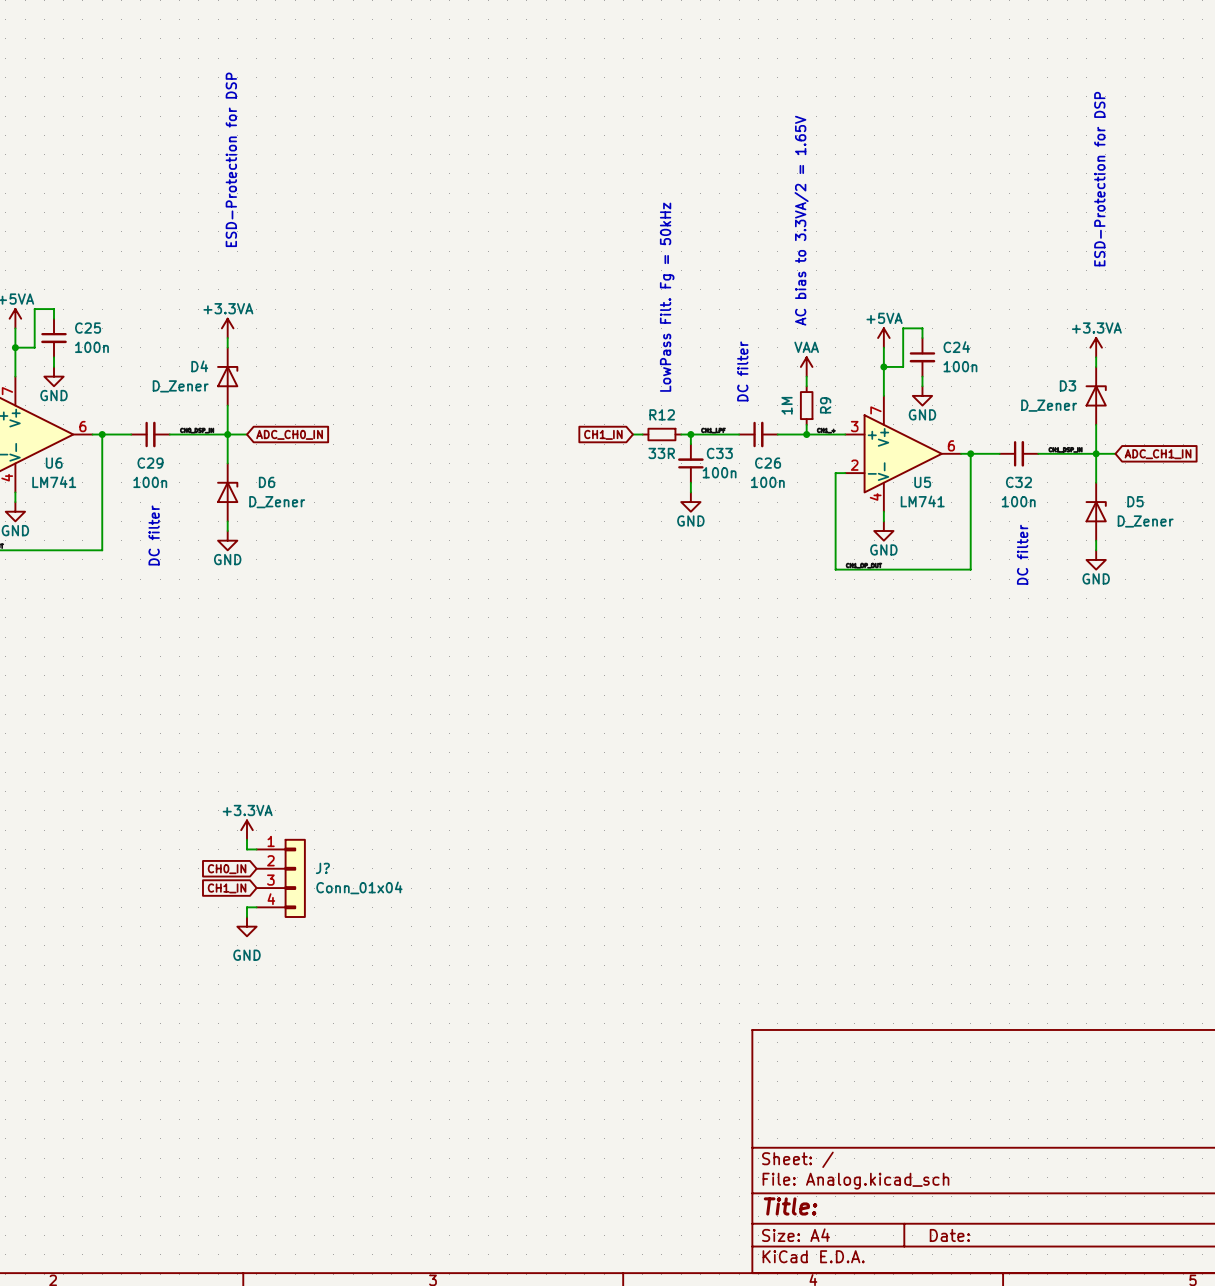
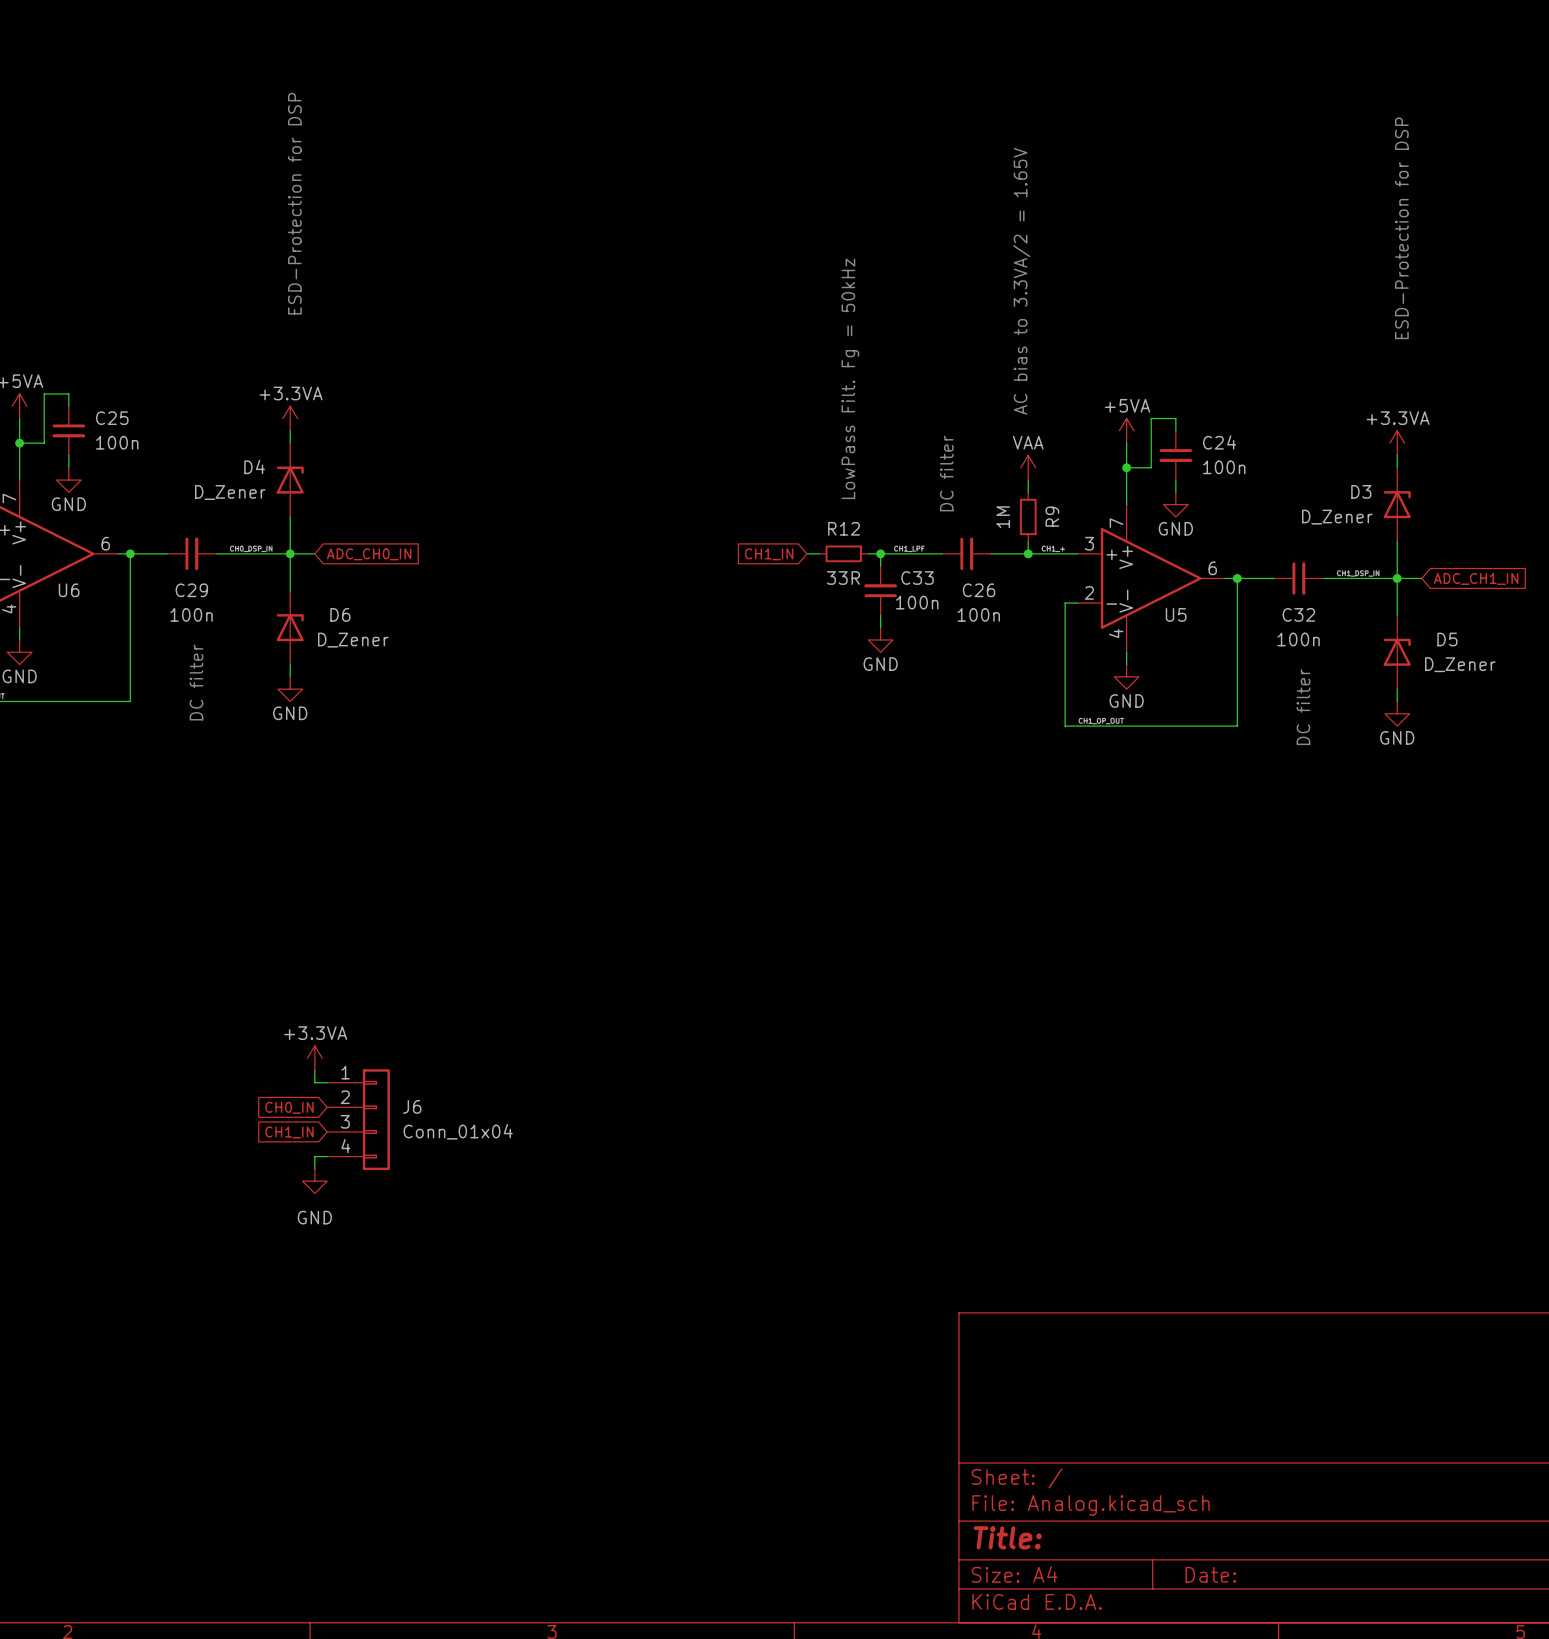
U6 value: LM741 (54, 482) -> none
U5 value: LM741 (922, 501) -> none
J? name: J? (322, 868) -> J6 (412, 1106)

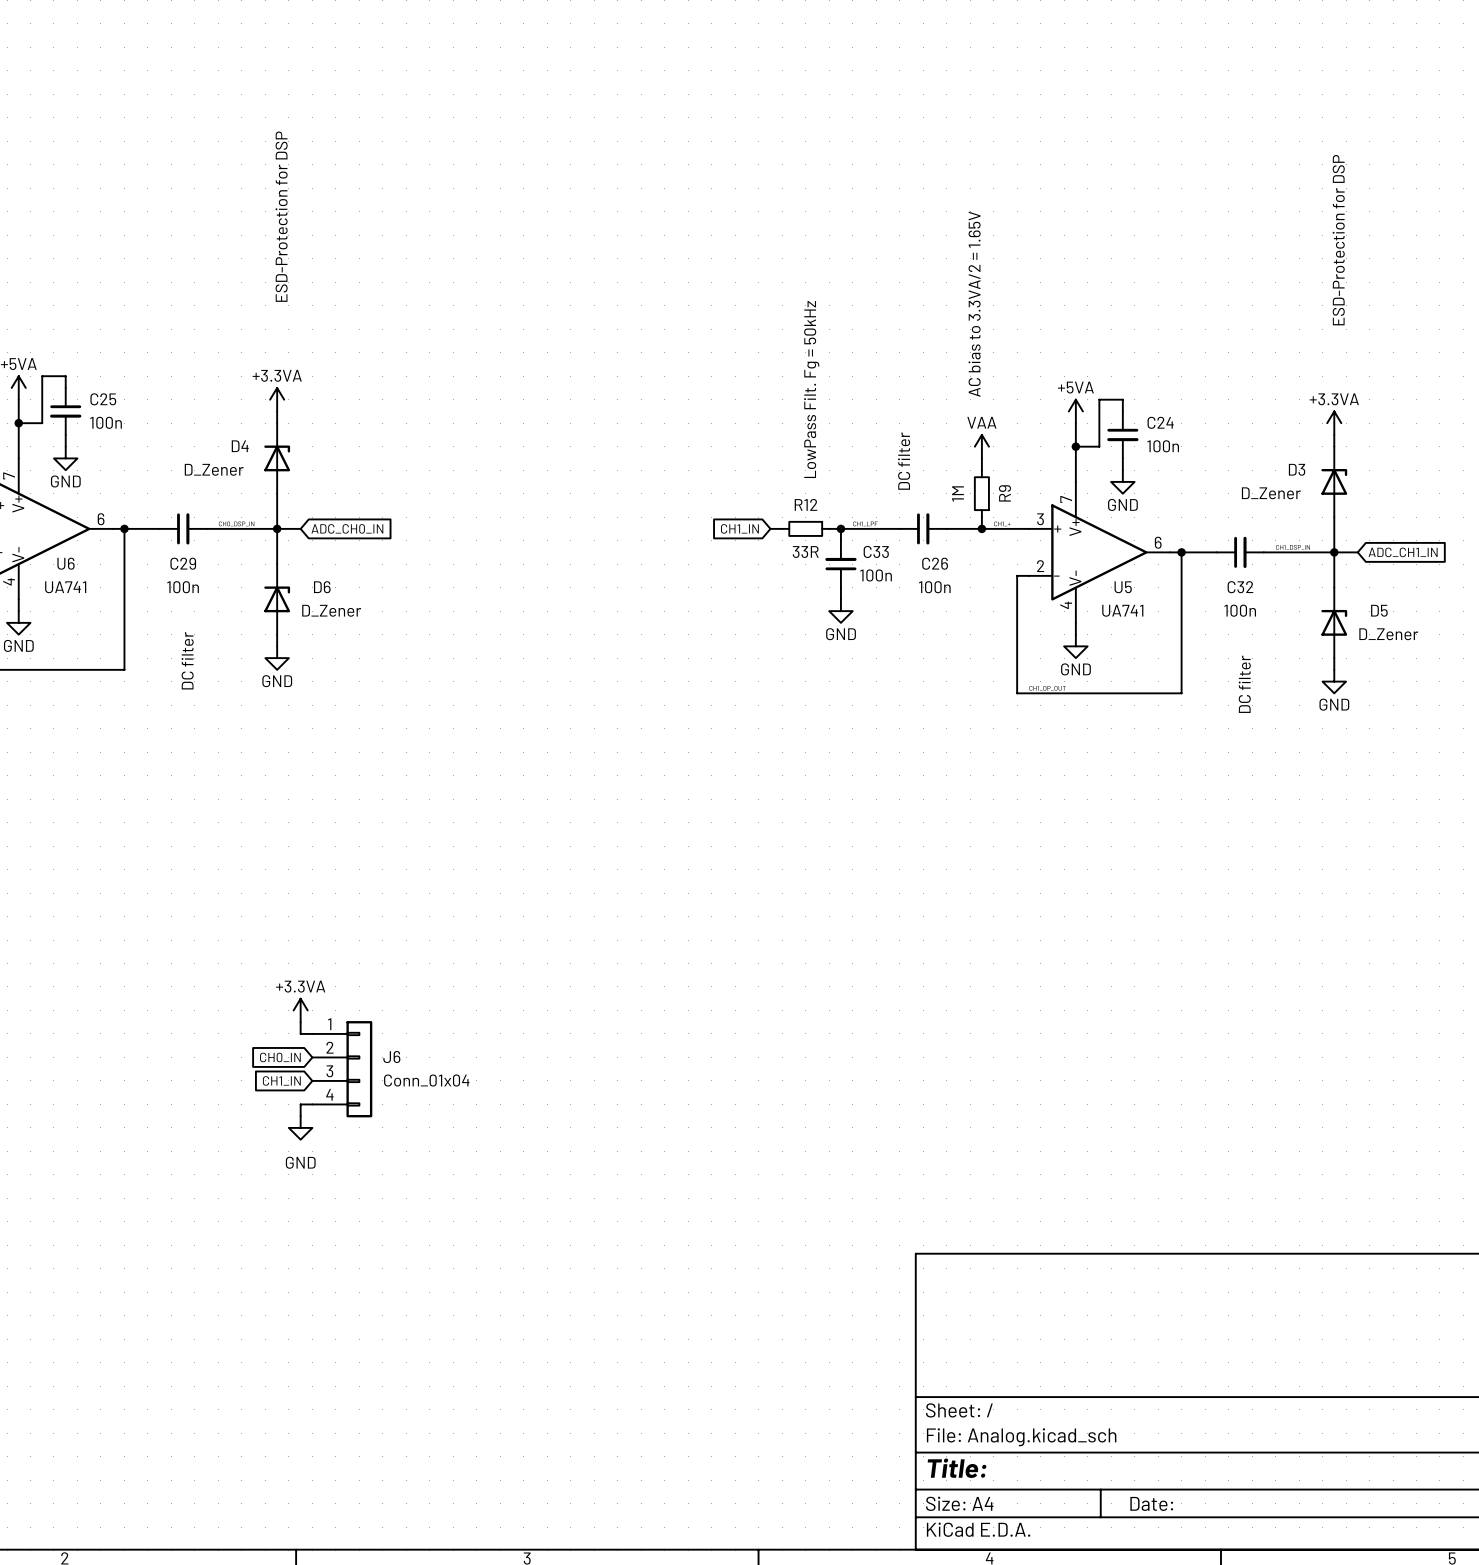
U6 value: none -> UA741 (65, 587)
U5 value: none -> UA741 (1122, 610)

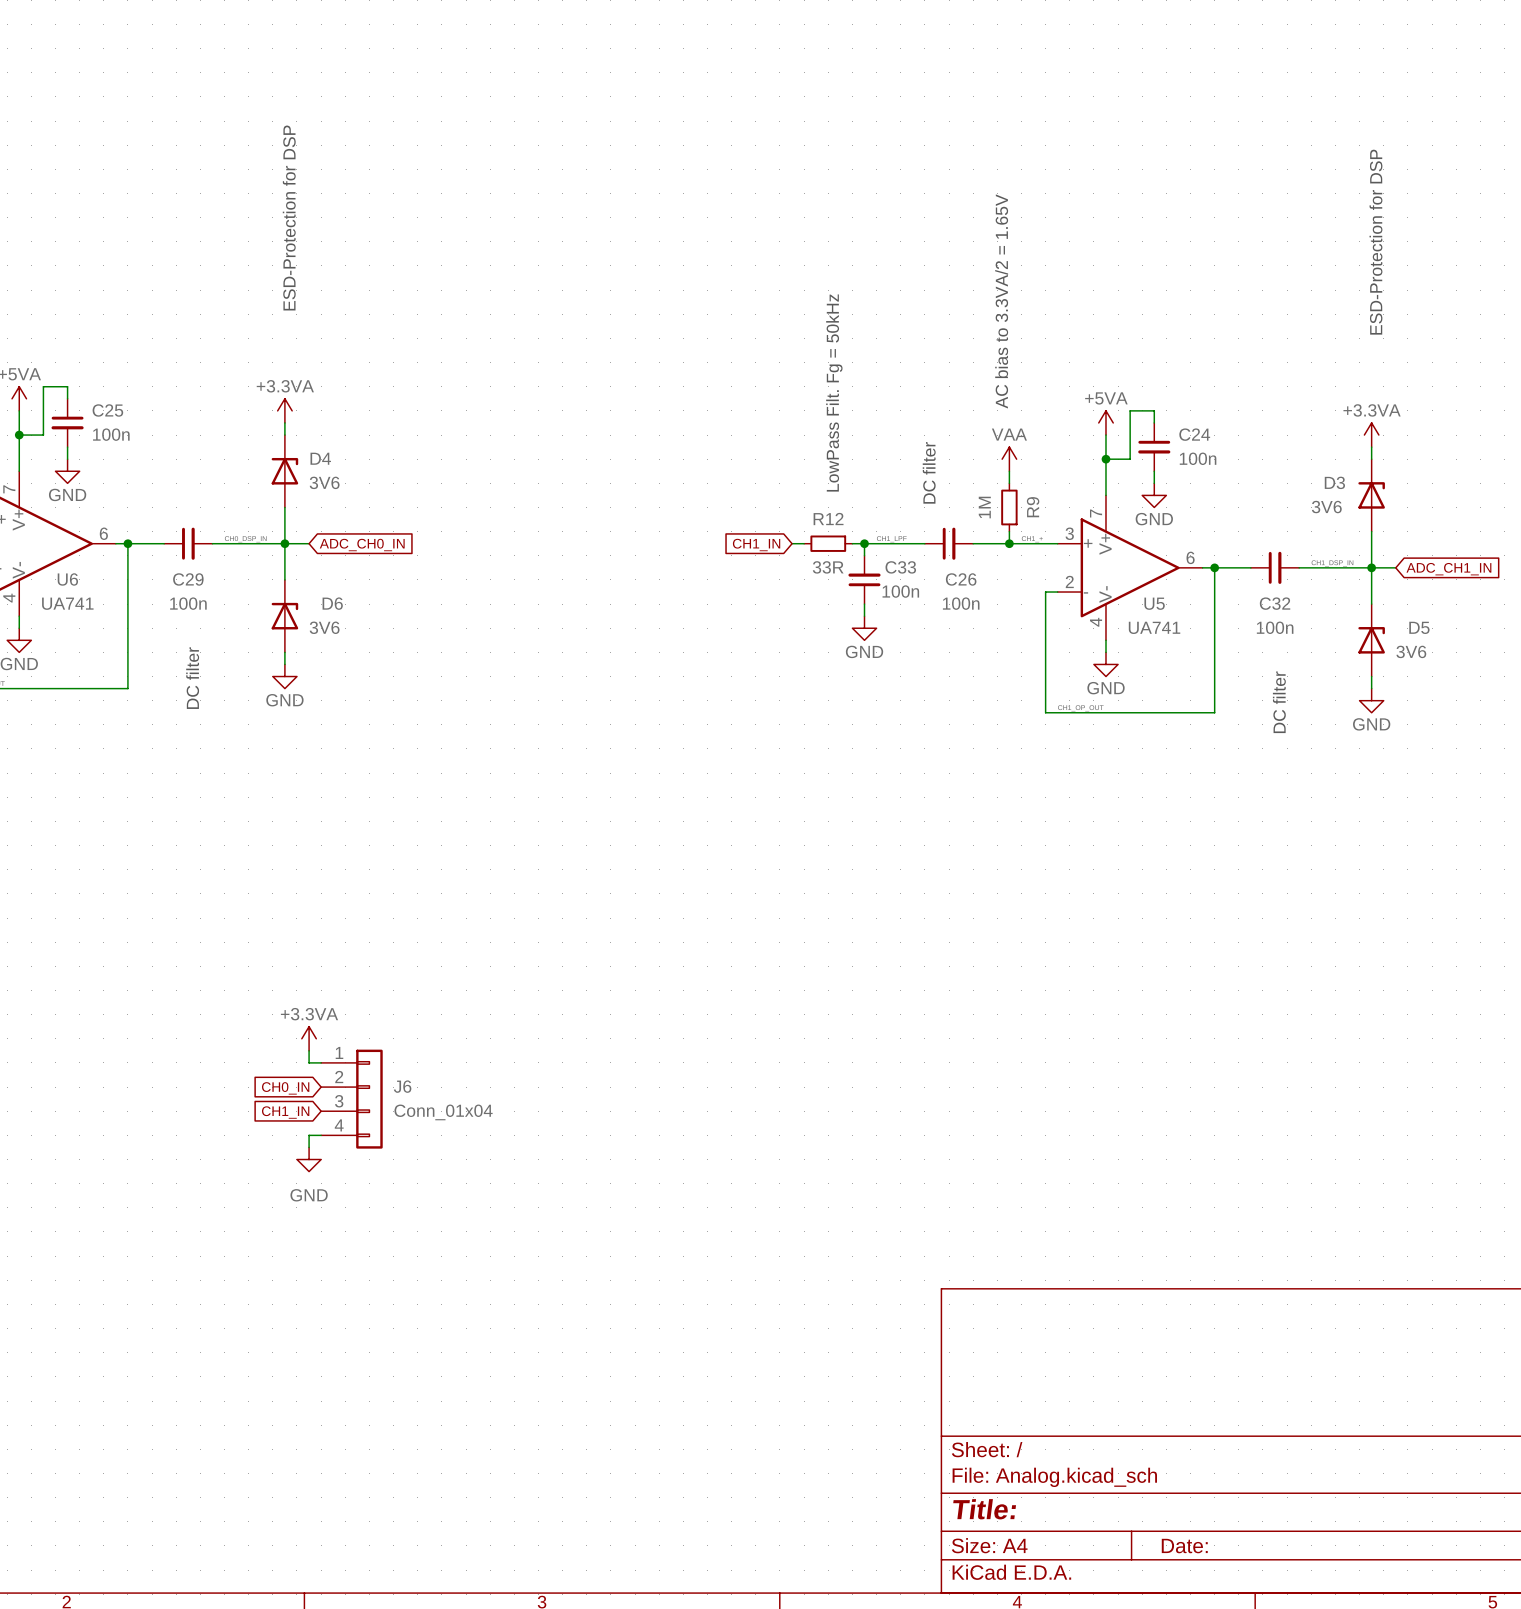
D4 name position: D4 (240, 446) -> D4 (320, 458)
D4 value: D_Zener (214, 469) -> 3V6 (324, 482)
D3 value: D_Zener (1271, 493) -> 3V6 (1326, 507)
D6 value: D_Zener (331, 610) -> 3V6 (324, 627)
D5 value: D_Zener (1388, 634) -> 3V6 (1411, 651)

